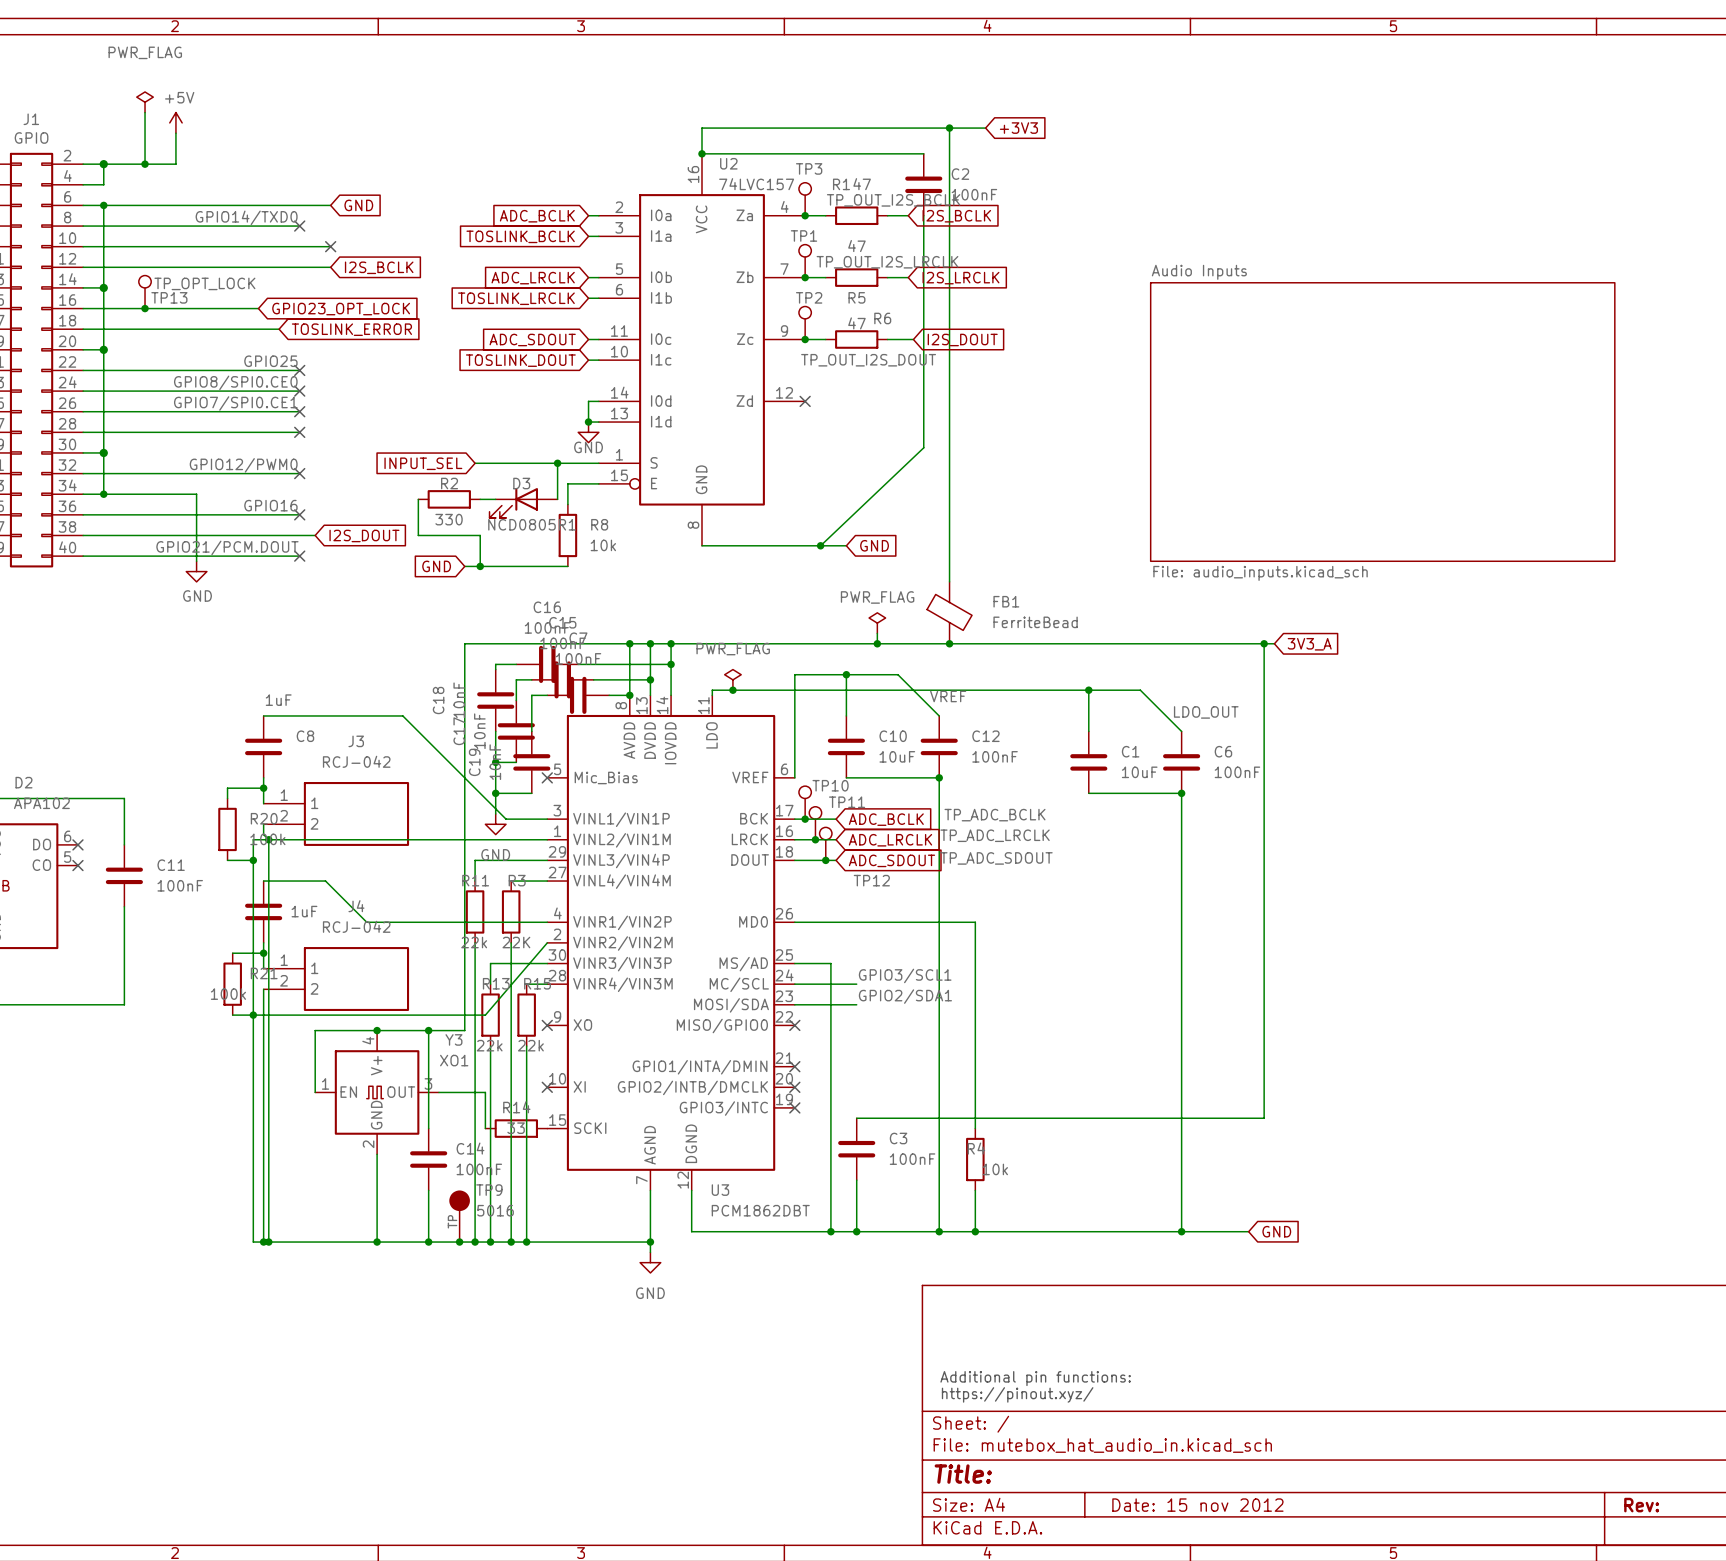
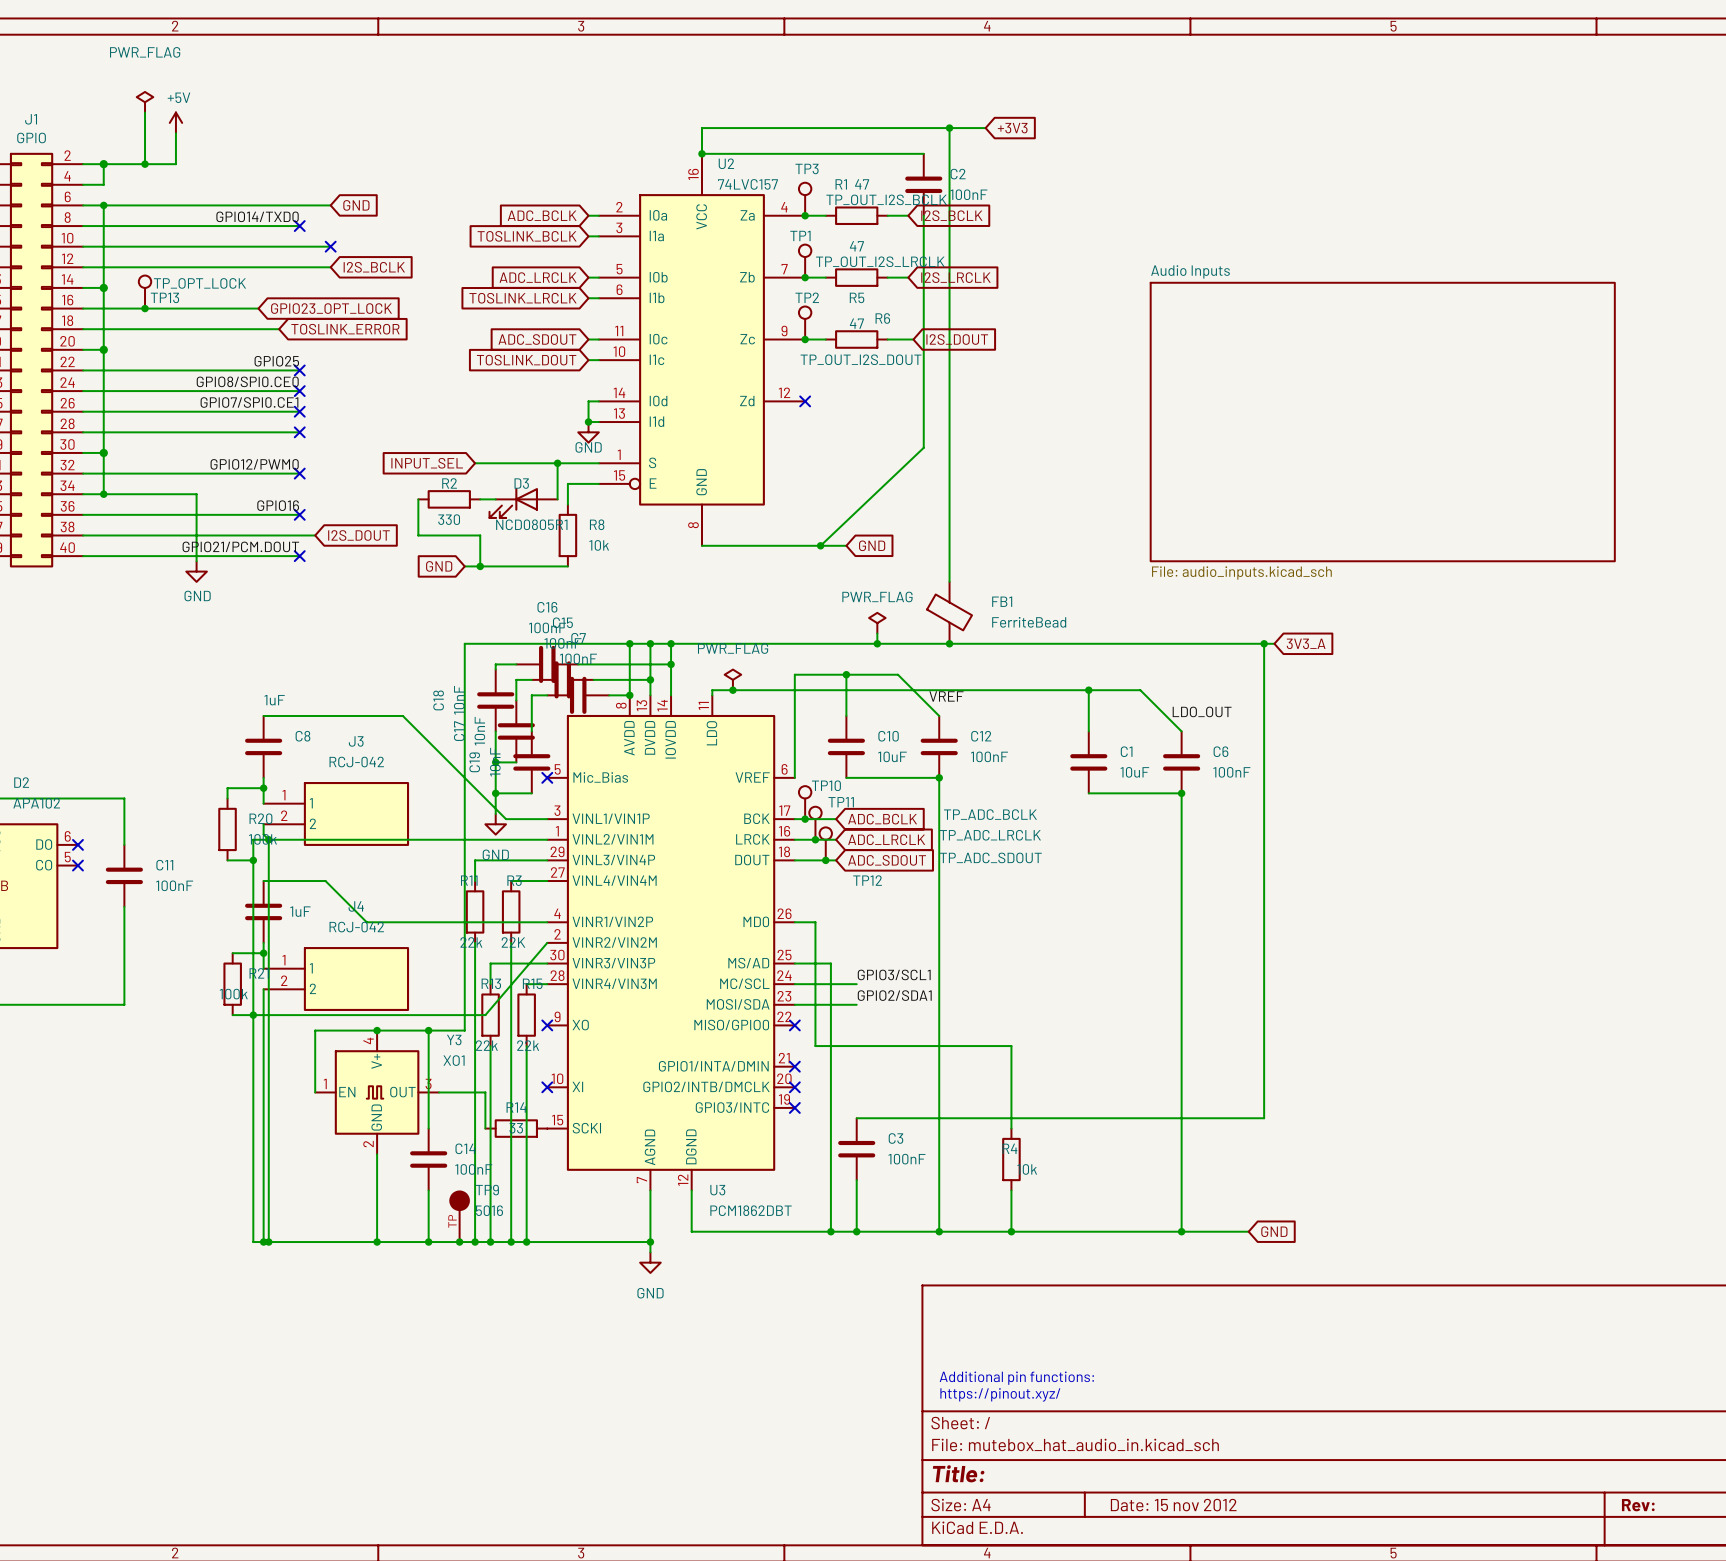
wire: (815, 922) (975, 922) (975, 1128) -> (815, 922) (815, 1046) (1011, 1046) (1011, 1128)
R4 position: (975, 1159) -> (1011, 1159)
wire: (975, 1190) (975, 1231) -> (1011, 1190) (1011, 1231)
junction position: (975, 1231) -> (1011, 1231)

